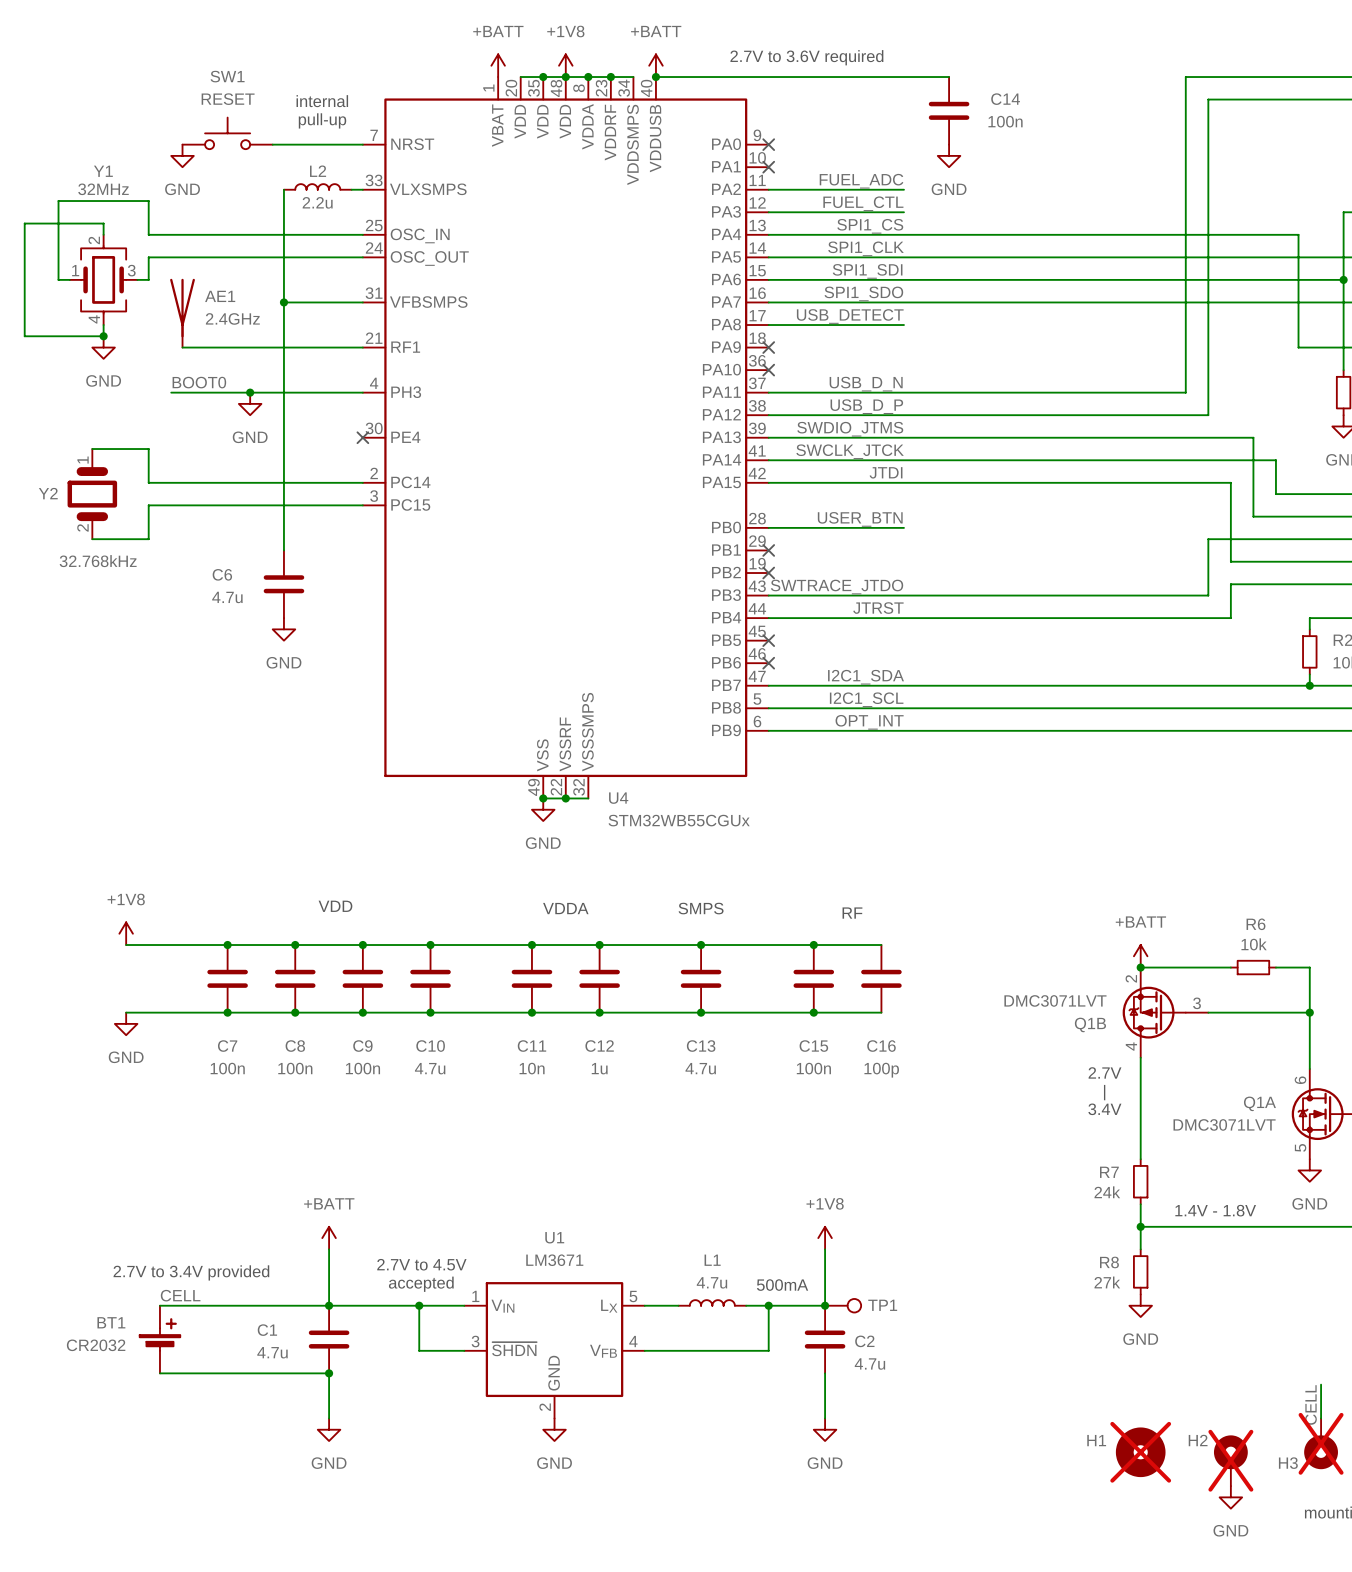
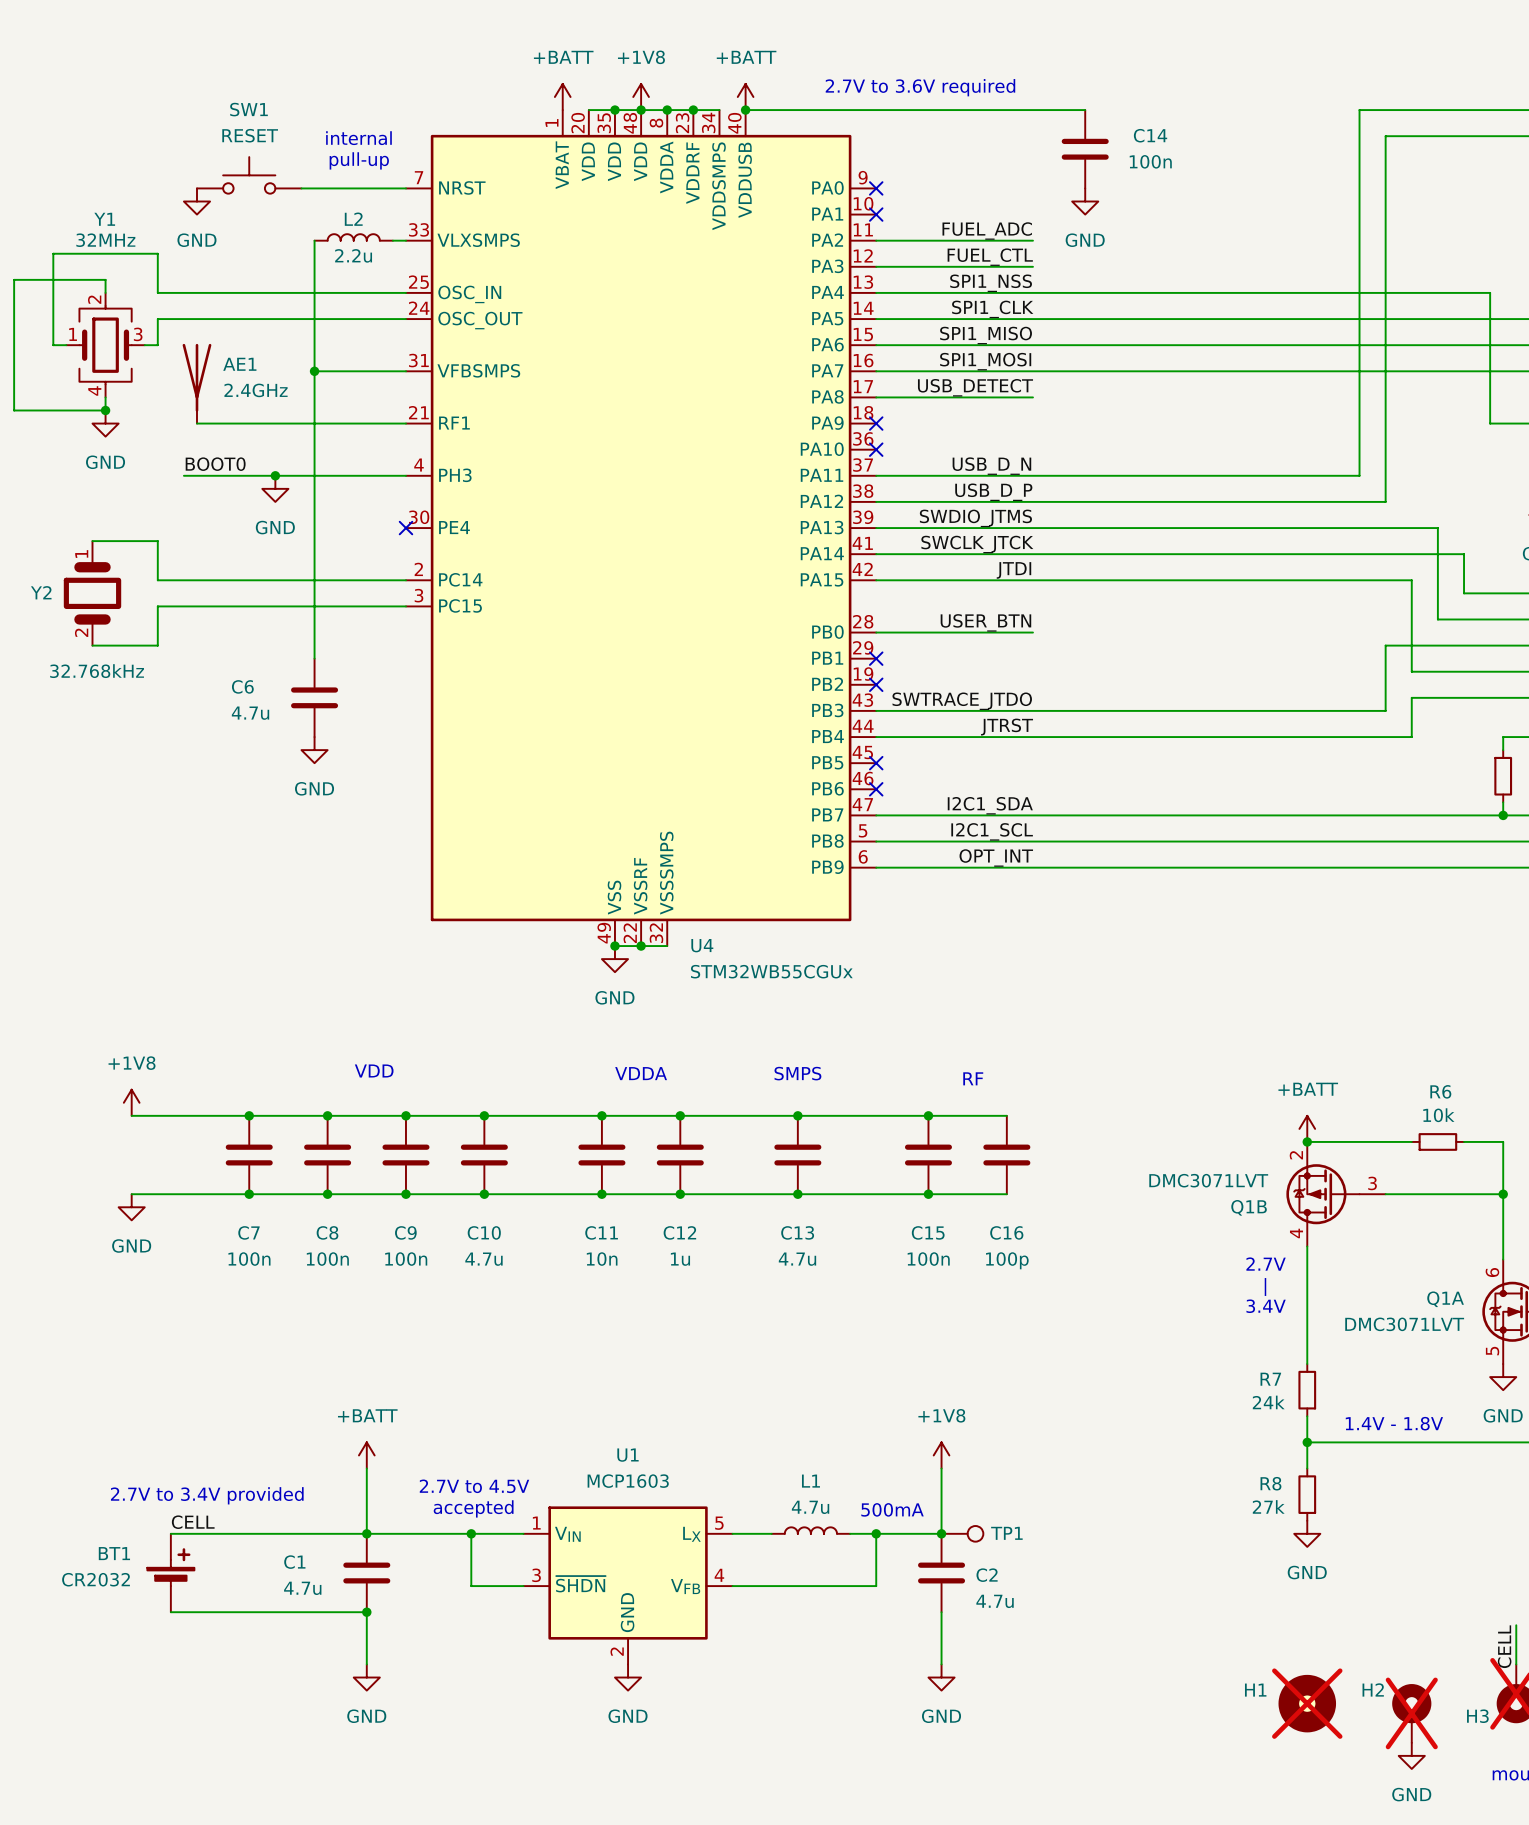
label: SPI1_CS (870, 226) -> SPI1_NSS (991, 283)
label: SPI1_SDI (867, 271) -> SPI1_MISO (986, 335)
label: SPI1_SDO (863, 293) -> SPI1_MOSI (985, 361)
U1 value: LM3671 (554, 1260) -> MCP1603 (628, 1481)

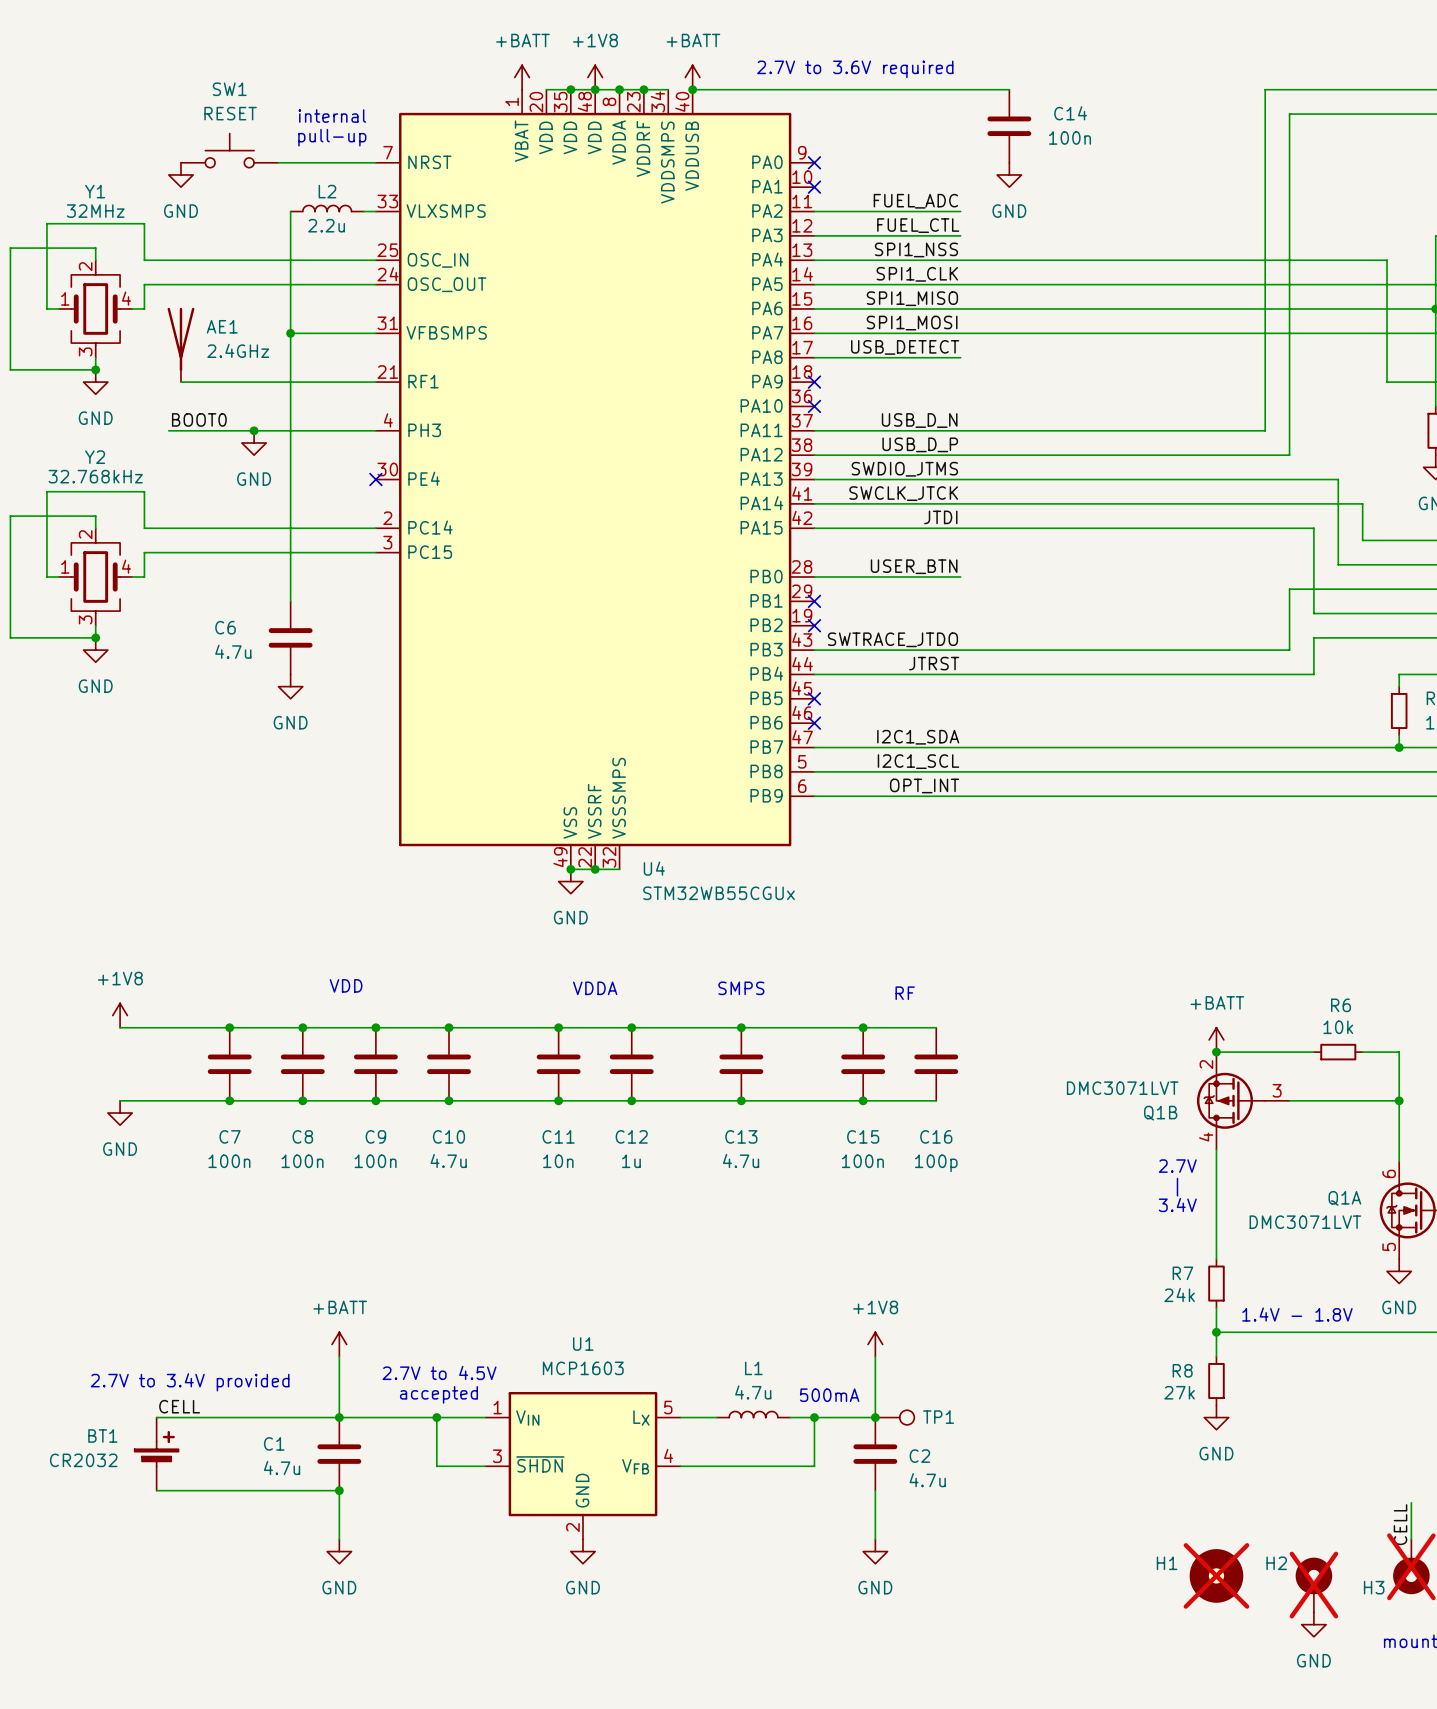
Y1 pin number: 3 (138, 334) -> 4 (126, 298)
Y1 pin number: 4 (94, 390) -> 3 (85, 351)
Y2 symbol: [63, 541, 122, 646] -> [59, 528, 133, 626]
wire: none -> (83, 491) (46, 491) (46, 576) (59, 576)
wire: none -> (95, 528) (95, 516) (10, 516) (10, 637) (95, 637) (95, 625)
Y2 name position: Y2 (41, 592) -> Y2 (95, 457)
wire: (157, 632) (157, 645) (92, 645) -> (144, 576) (132, 576)
Y2 value position: 32.768kHz (97, 671) -> 32.768kHz (95, 476)
junction: none -> (95, 637)
power symbol: none -> GND (95, 650)

